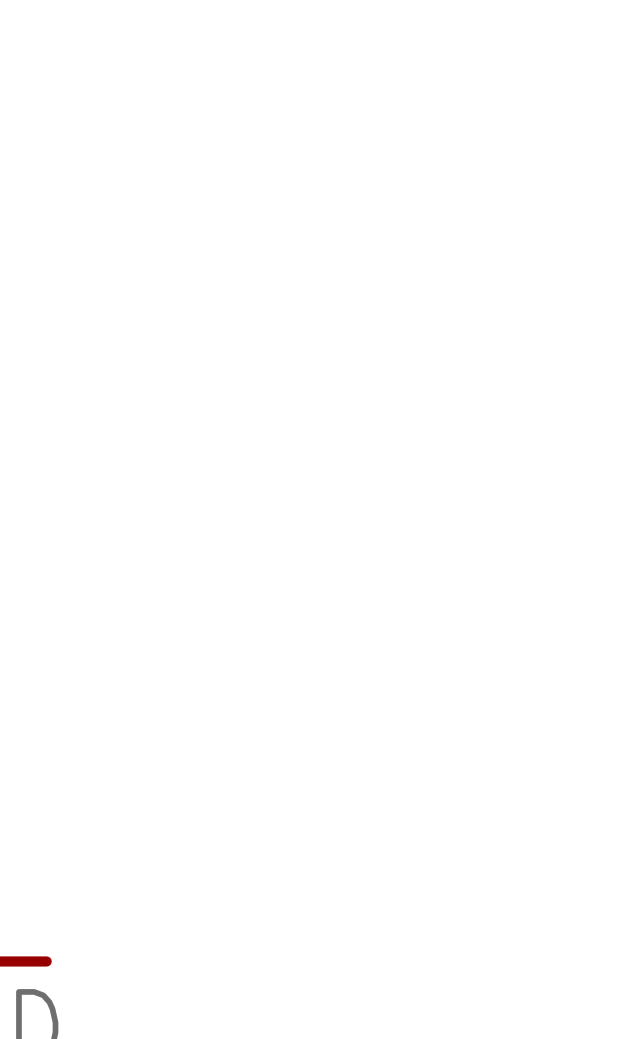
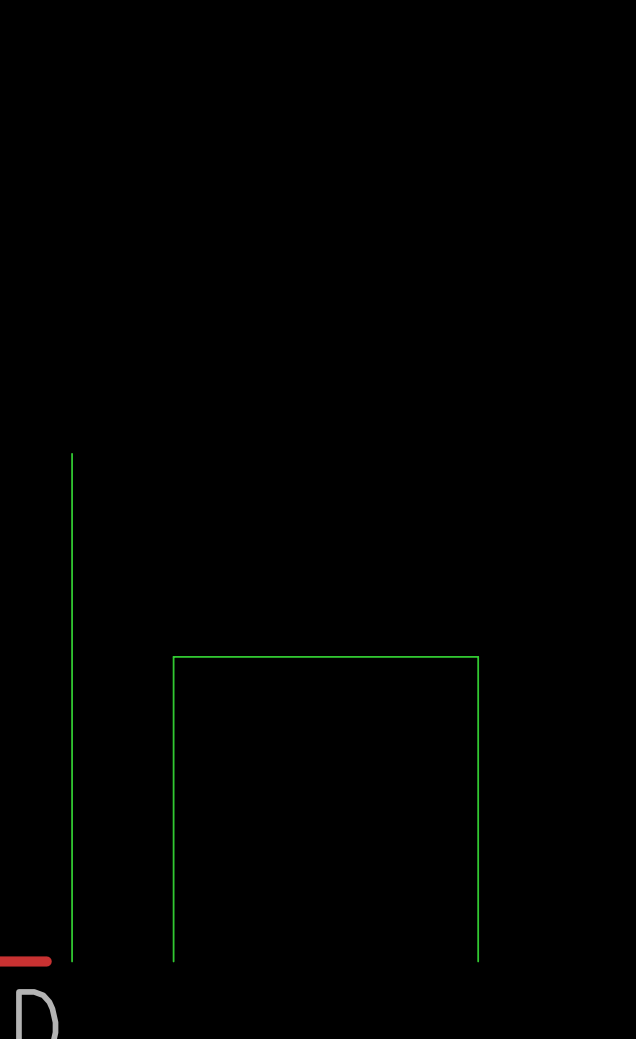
wire: none -> (72, 453) (72, 961)
wire: none -> (173, 961) (173, 656) (478, 656) (478, 961)

